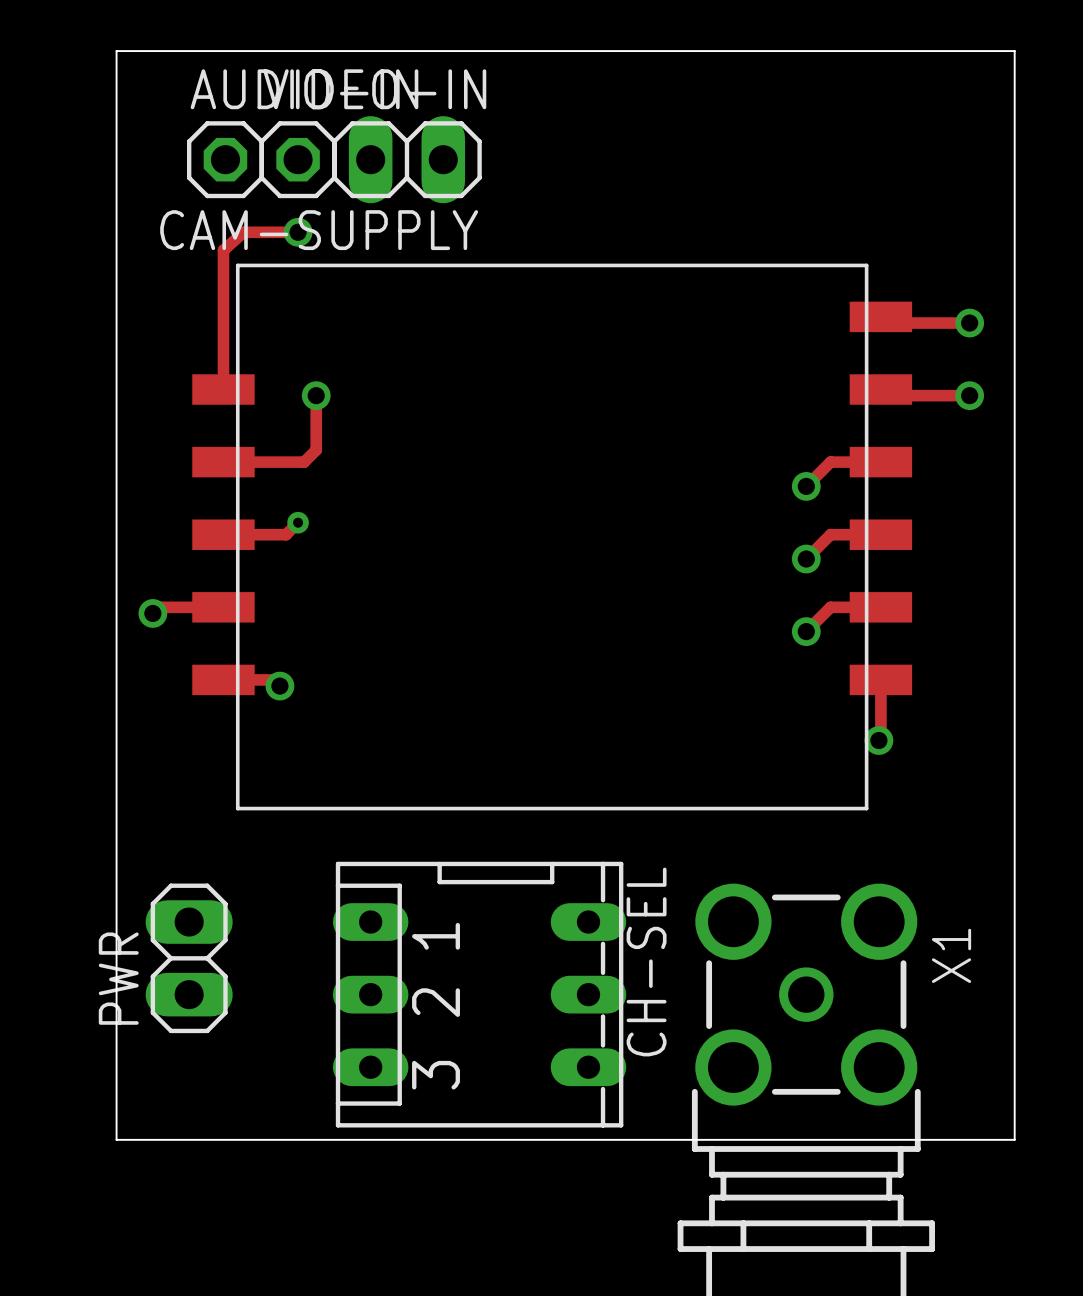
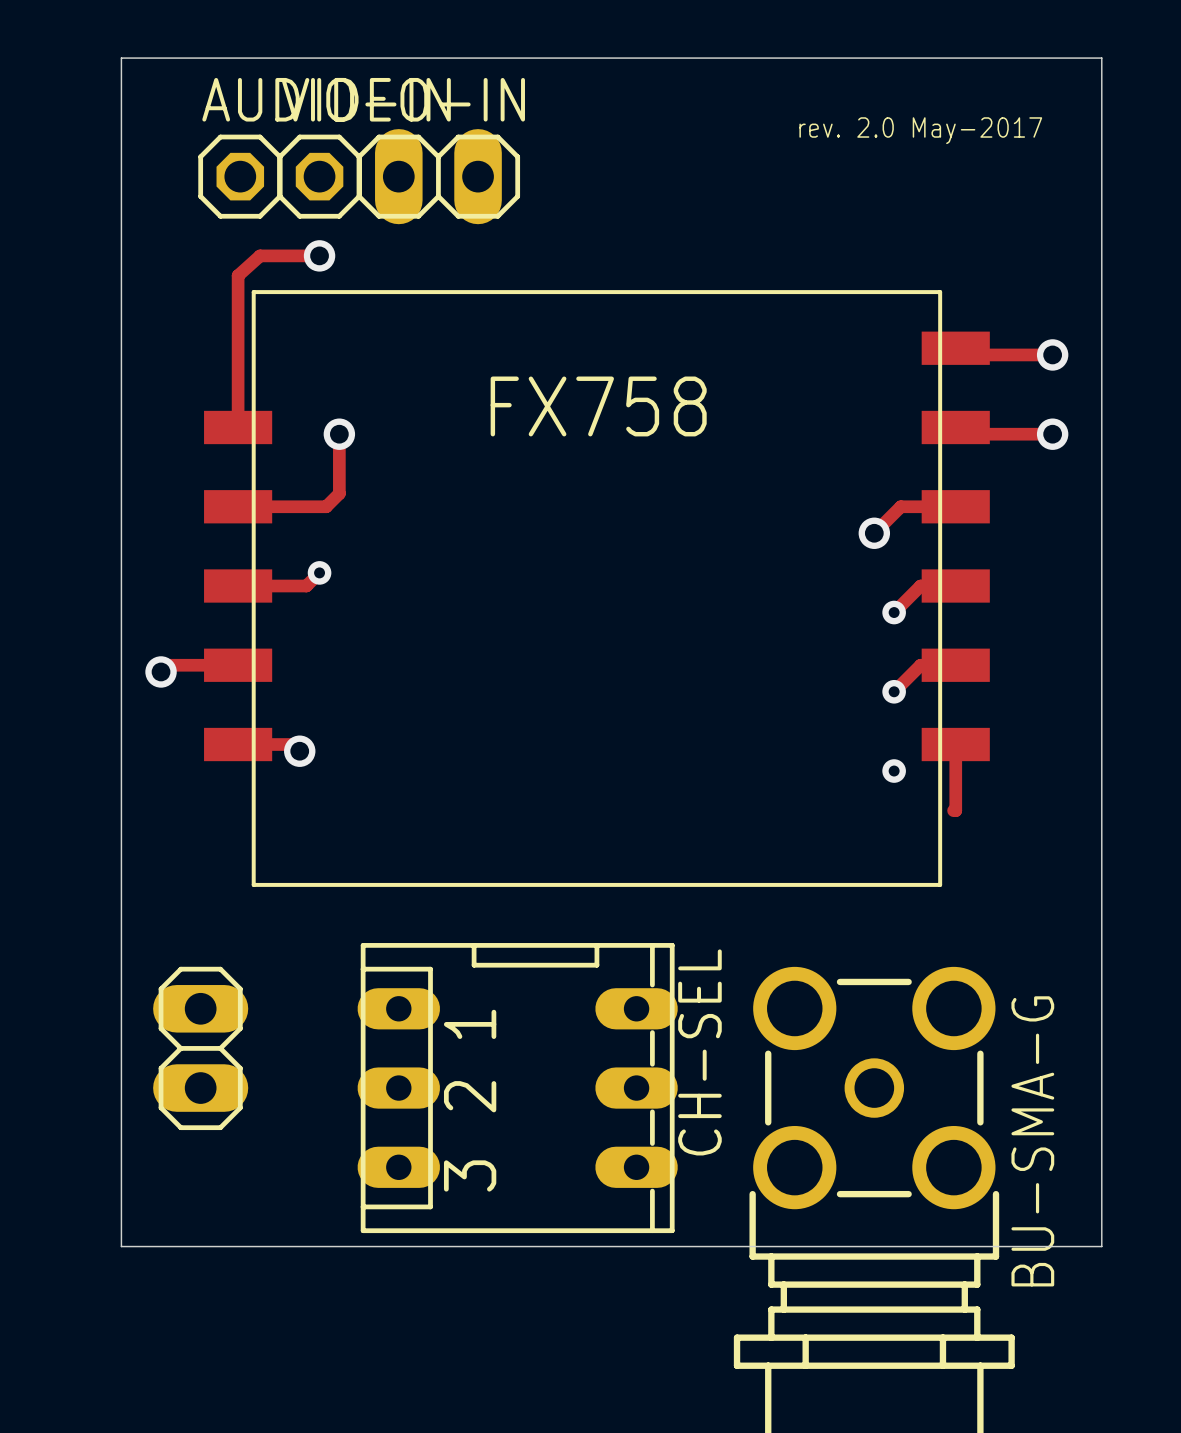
text: none -> rev. 2.0 May-2017 (920, 130)
CAM-SUPPLY name: CAM-SUPPLY (319, 230) -> none
text: none -> FX758 (598, 406)
track: (848, 534) (830, 534) (806, 559) -> (920, 586) (894, 612)
via position: (806, 559) -> (894, 612)
track: (848, 607) (830, 607) (806, 631) -> (920, 665) (894, 691)
via position: (806, 631) -> (894, 691)
via: none -> (894, 771)
via: (878, 740) -> none
X1 name: X1 (951, 955) -> none
PWR name: PWR (118, 978) -> none
X1 value: none -> BU-SMA-G (1032, 1141)

